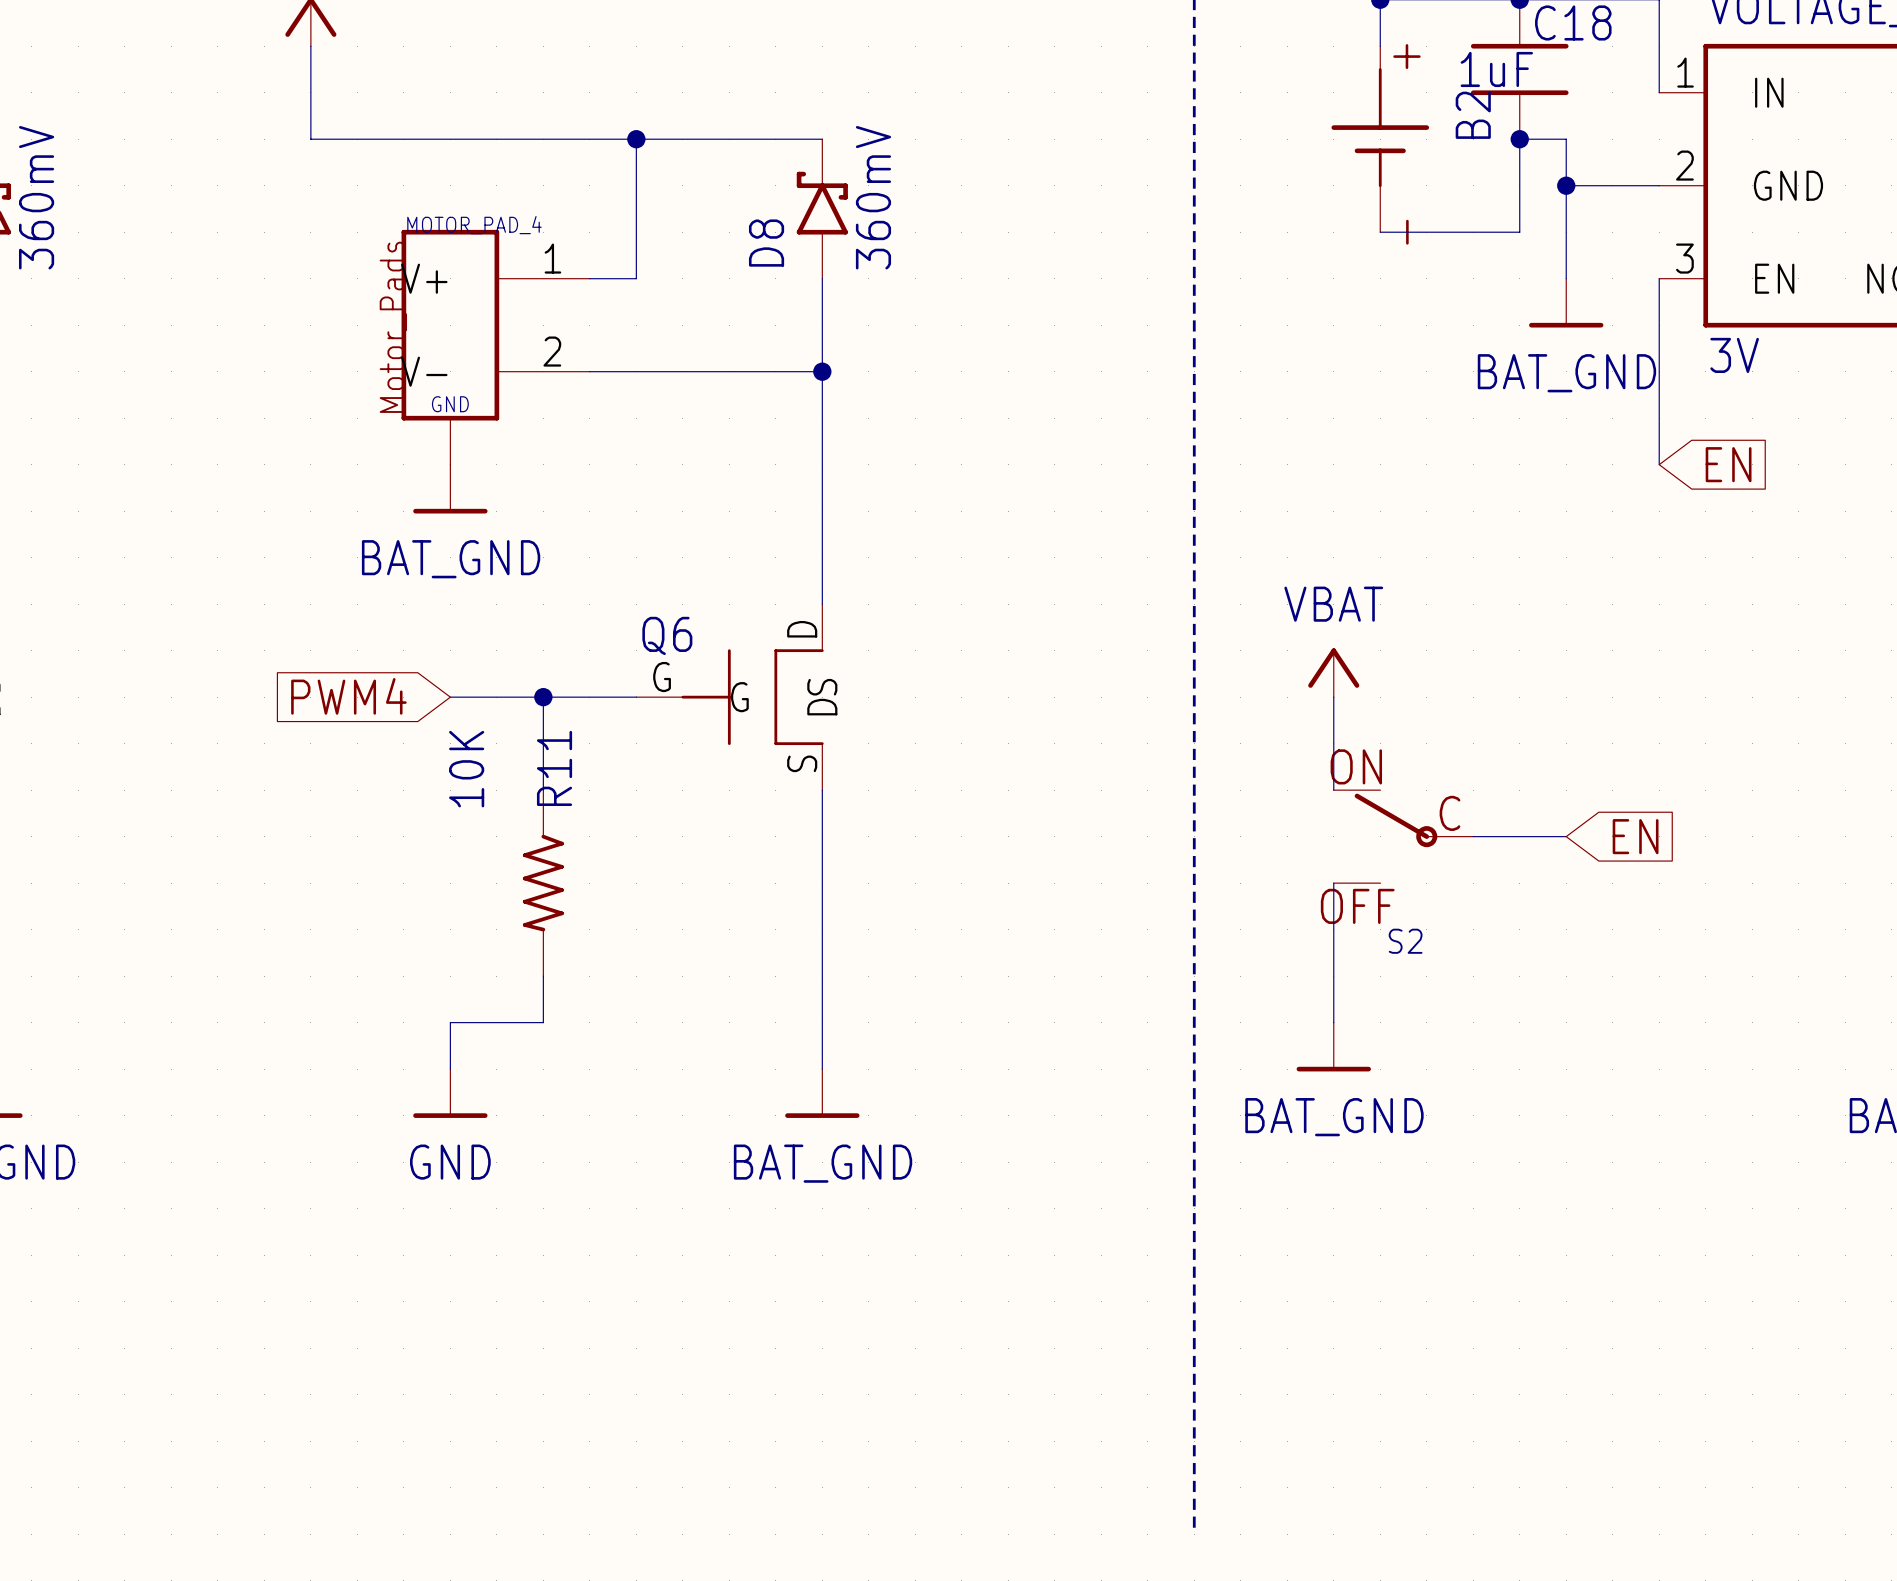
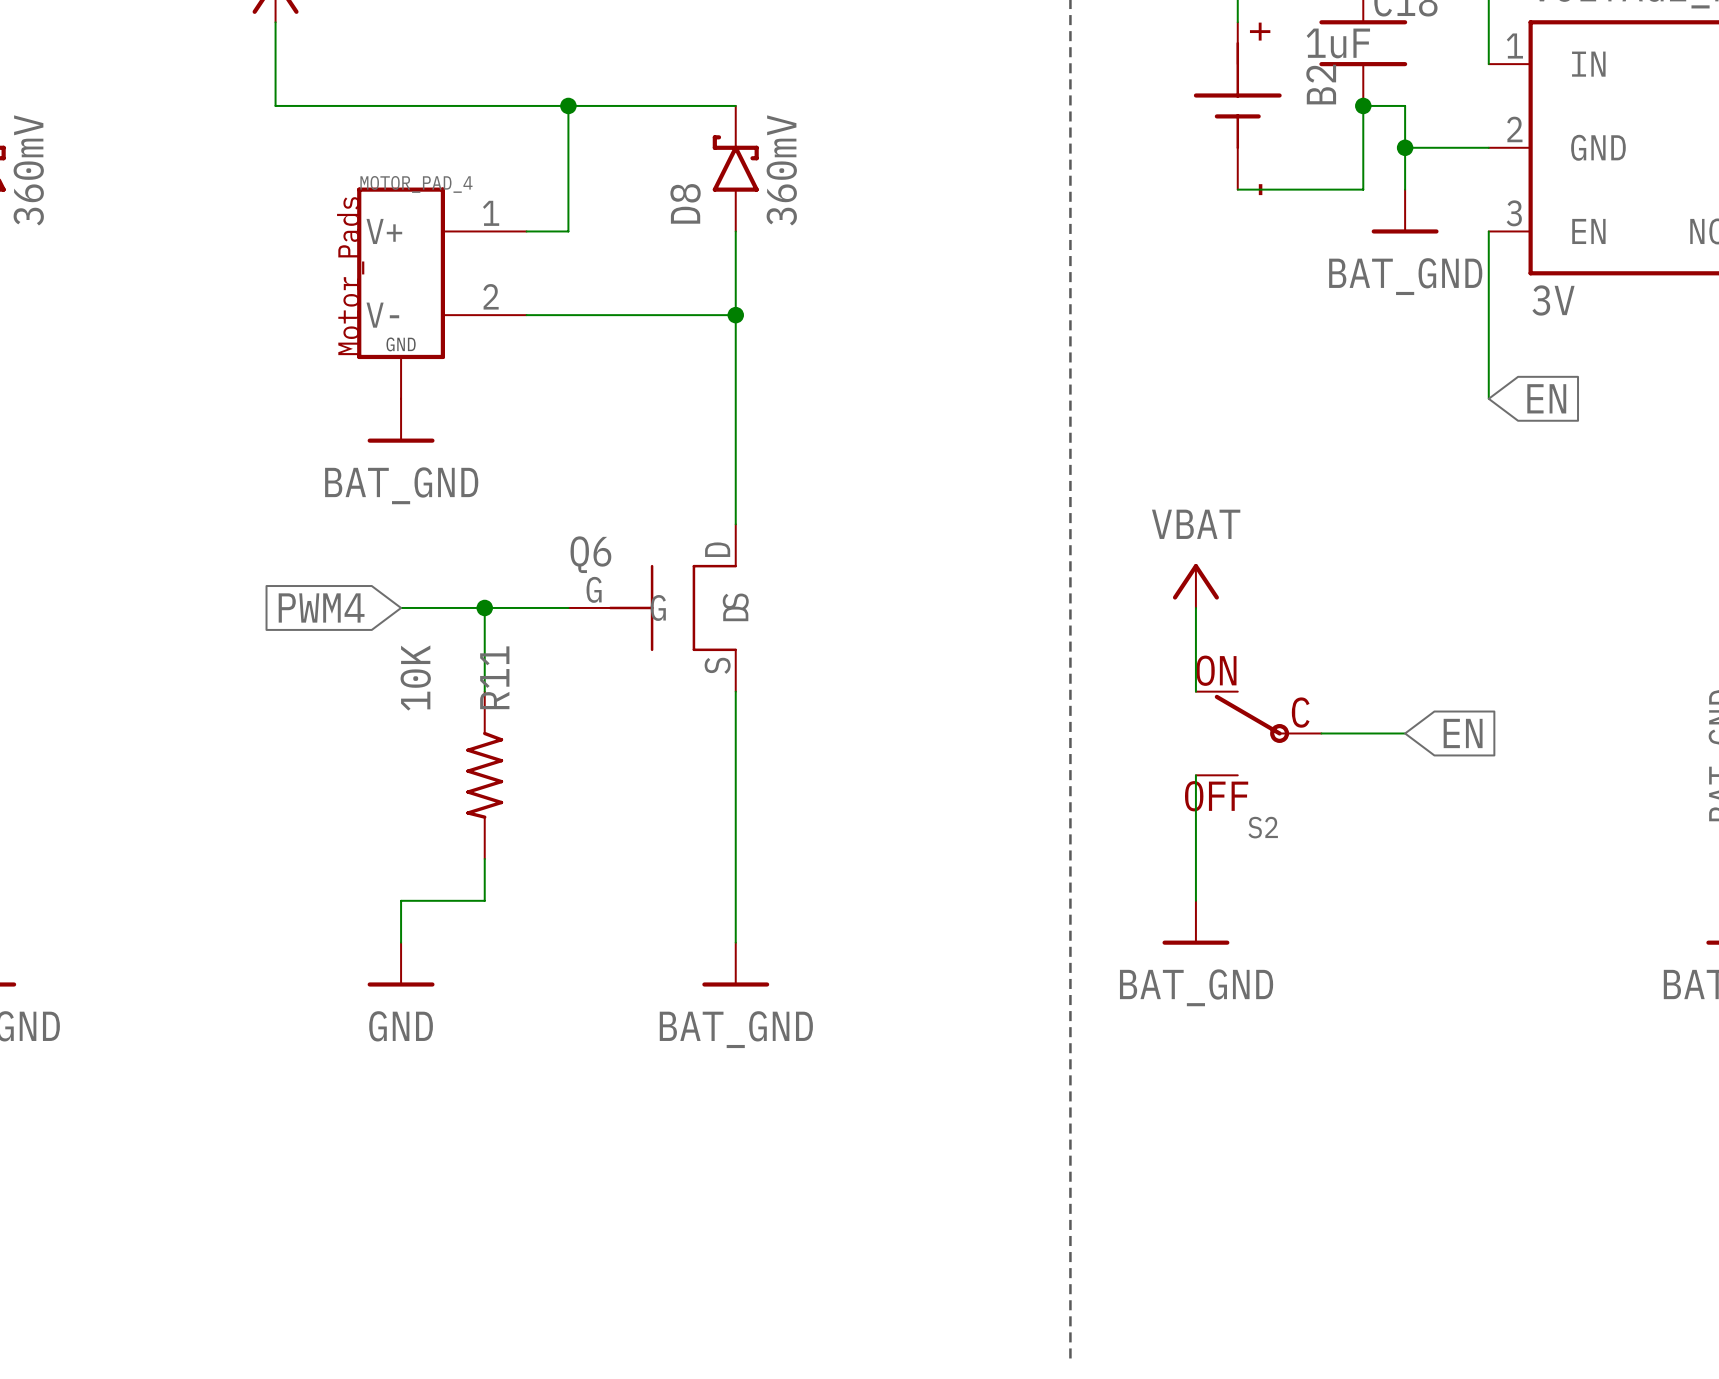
power symbol position: BAT_GND (1566, 303) -> BAT_GND (1405, 211)

